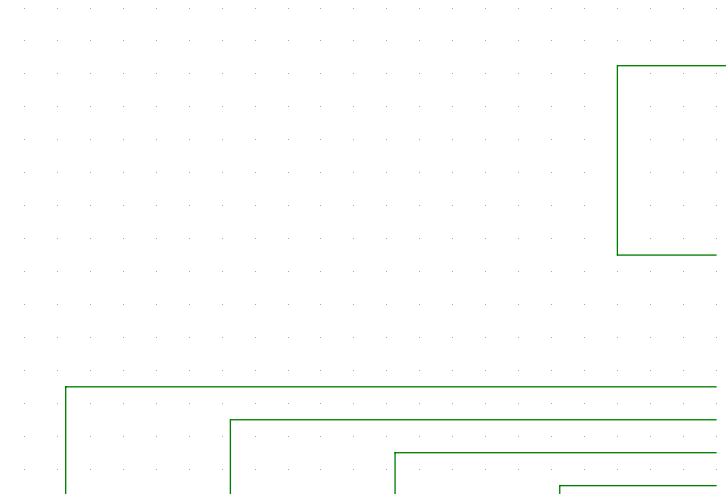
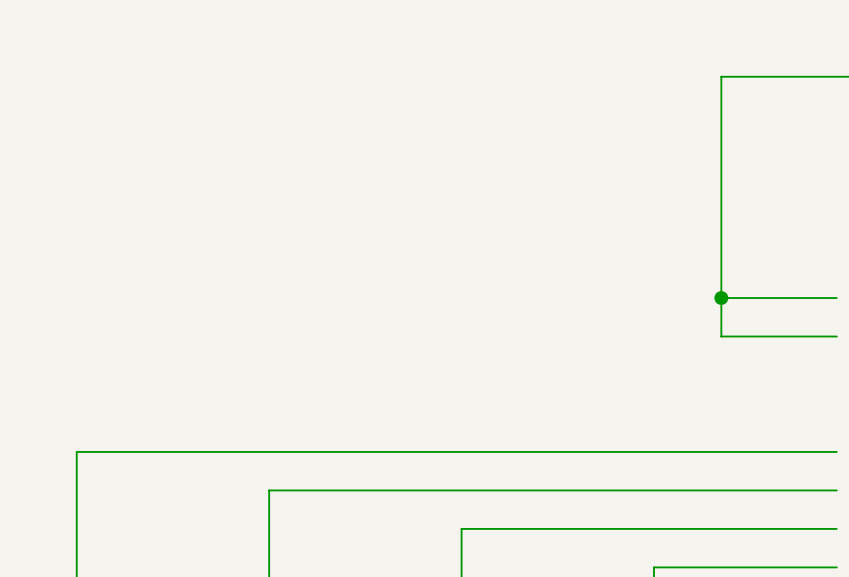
wire: none -> (721, 298) (721, 336) (836, 336)
junction: none -> (721, 298)

